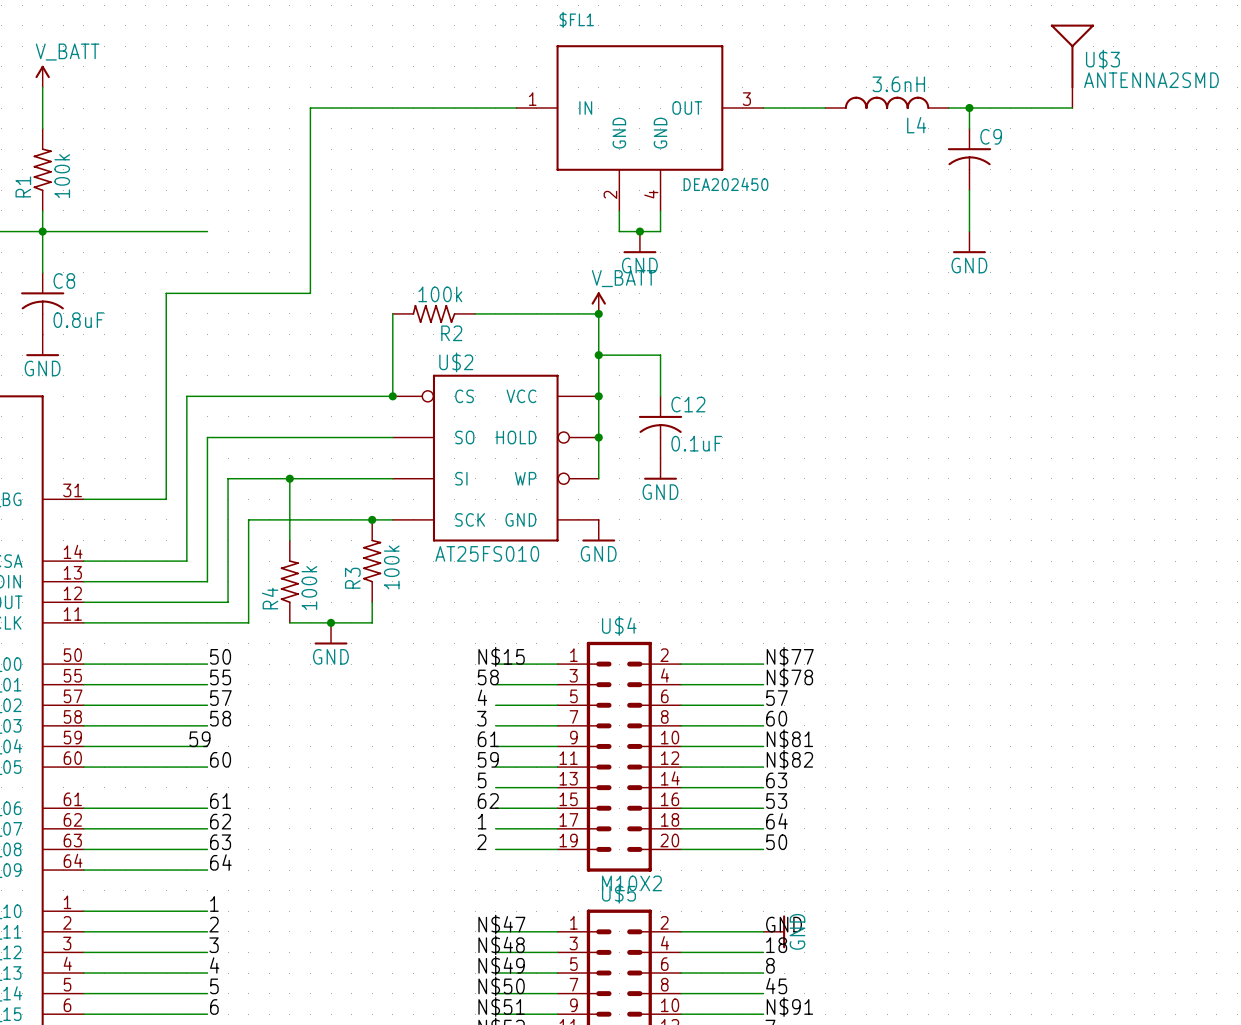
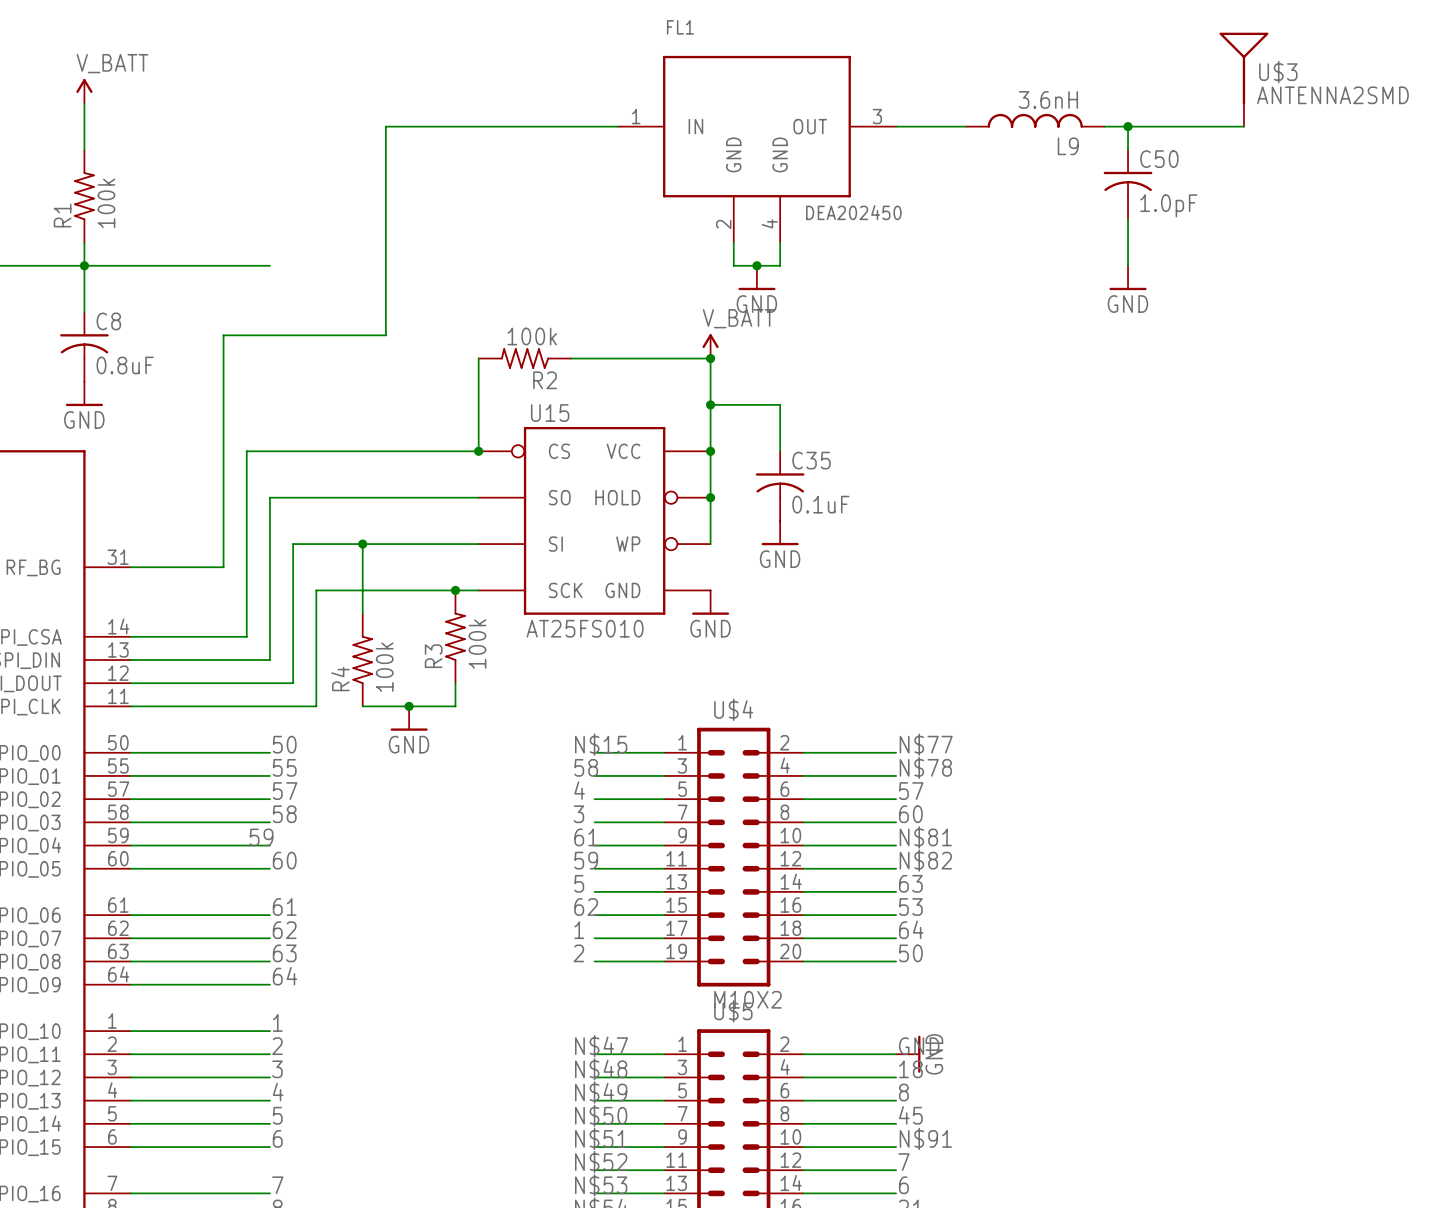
$FL1 name: $FL1 (576, 19) -> FL1 (680, 27)
L4 name: L4 (916, 125) -> L9 (1068, 146)
C9 name: C9 (991, 136) -> C50 (1159, 159)
C9 value: none -> 1.0pF (1168, 205)
U$2 name: U$2 (456, 362) -> U15 (550, 413)
C12 name: C12 (688, 404) -> C35 (811, 460)

